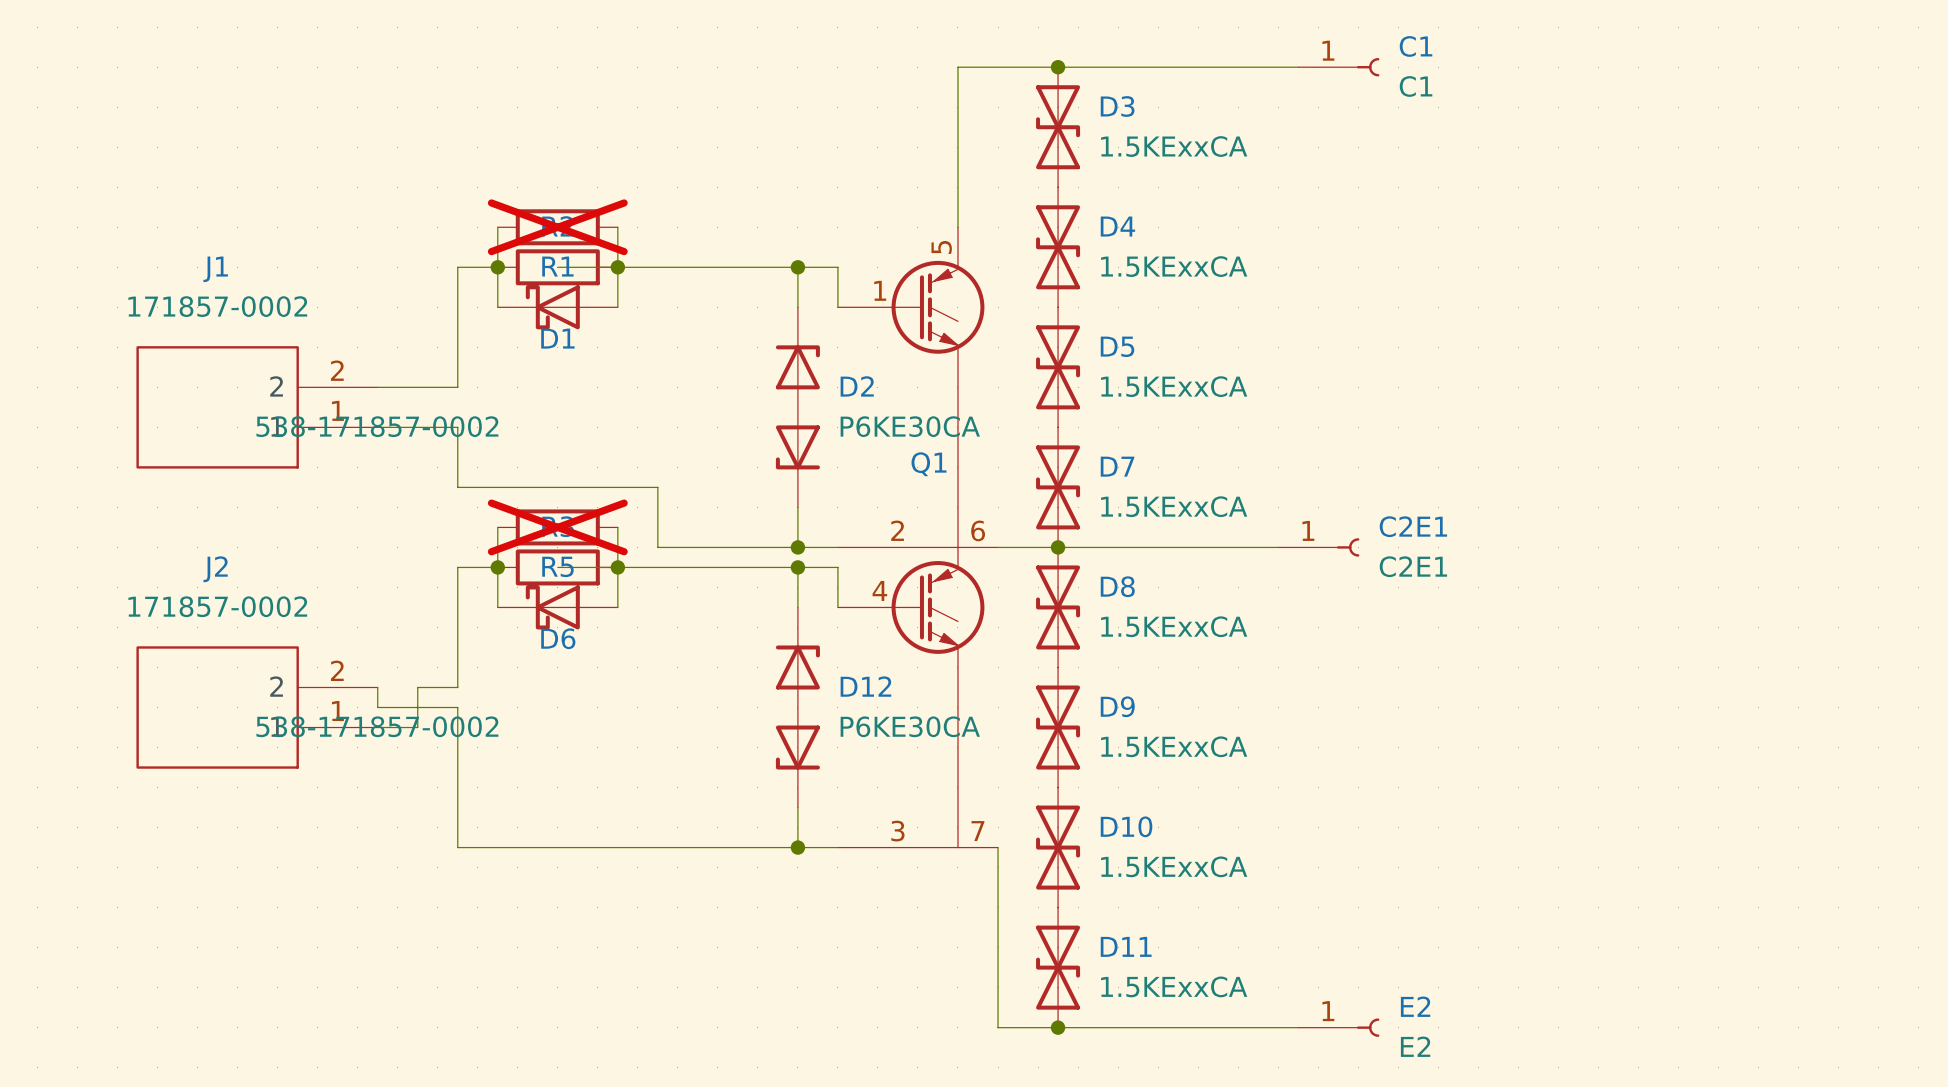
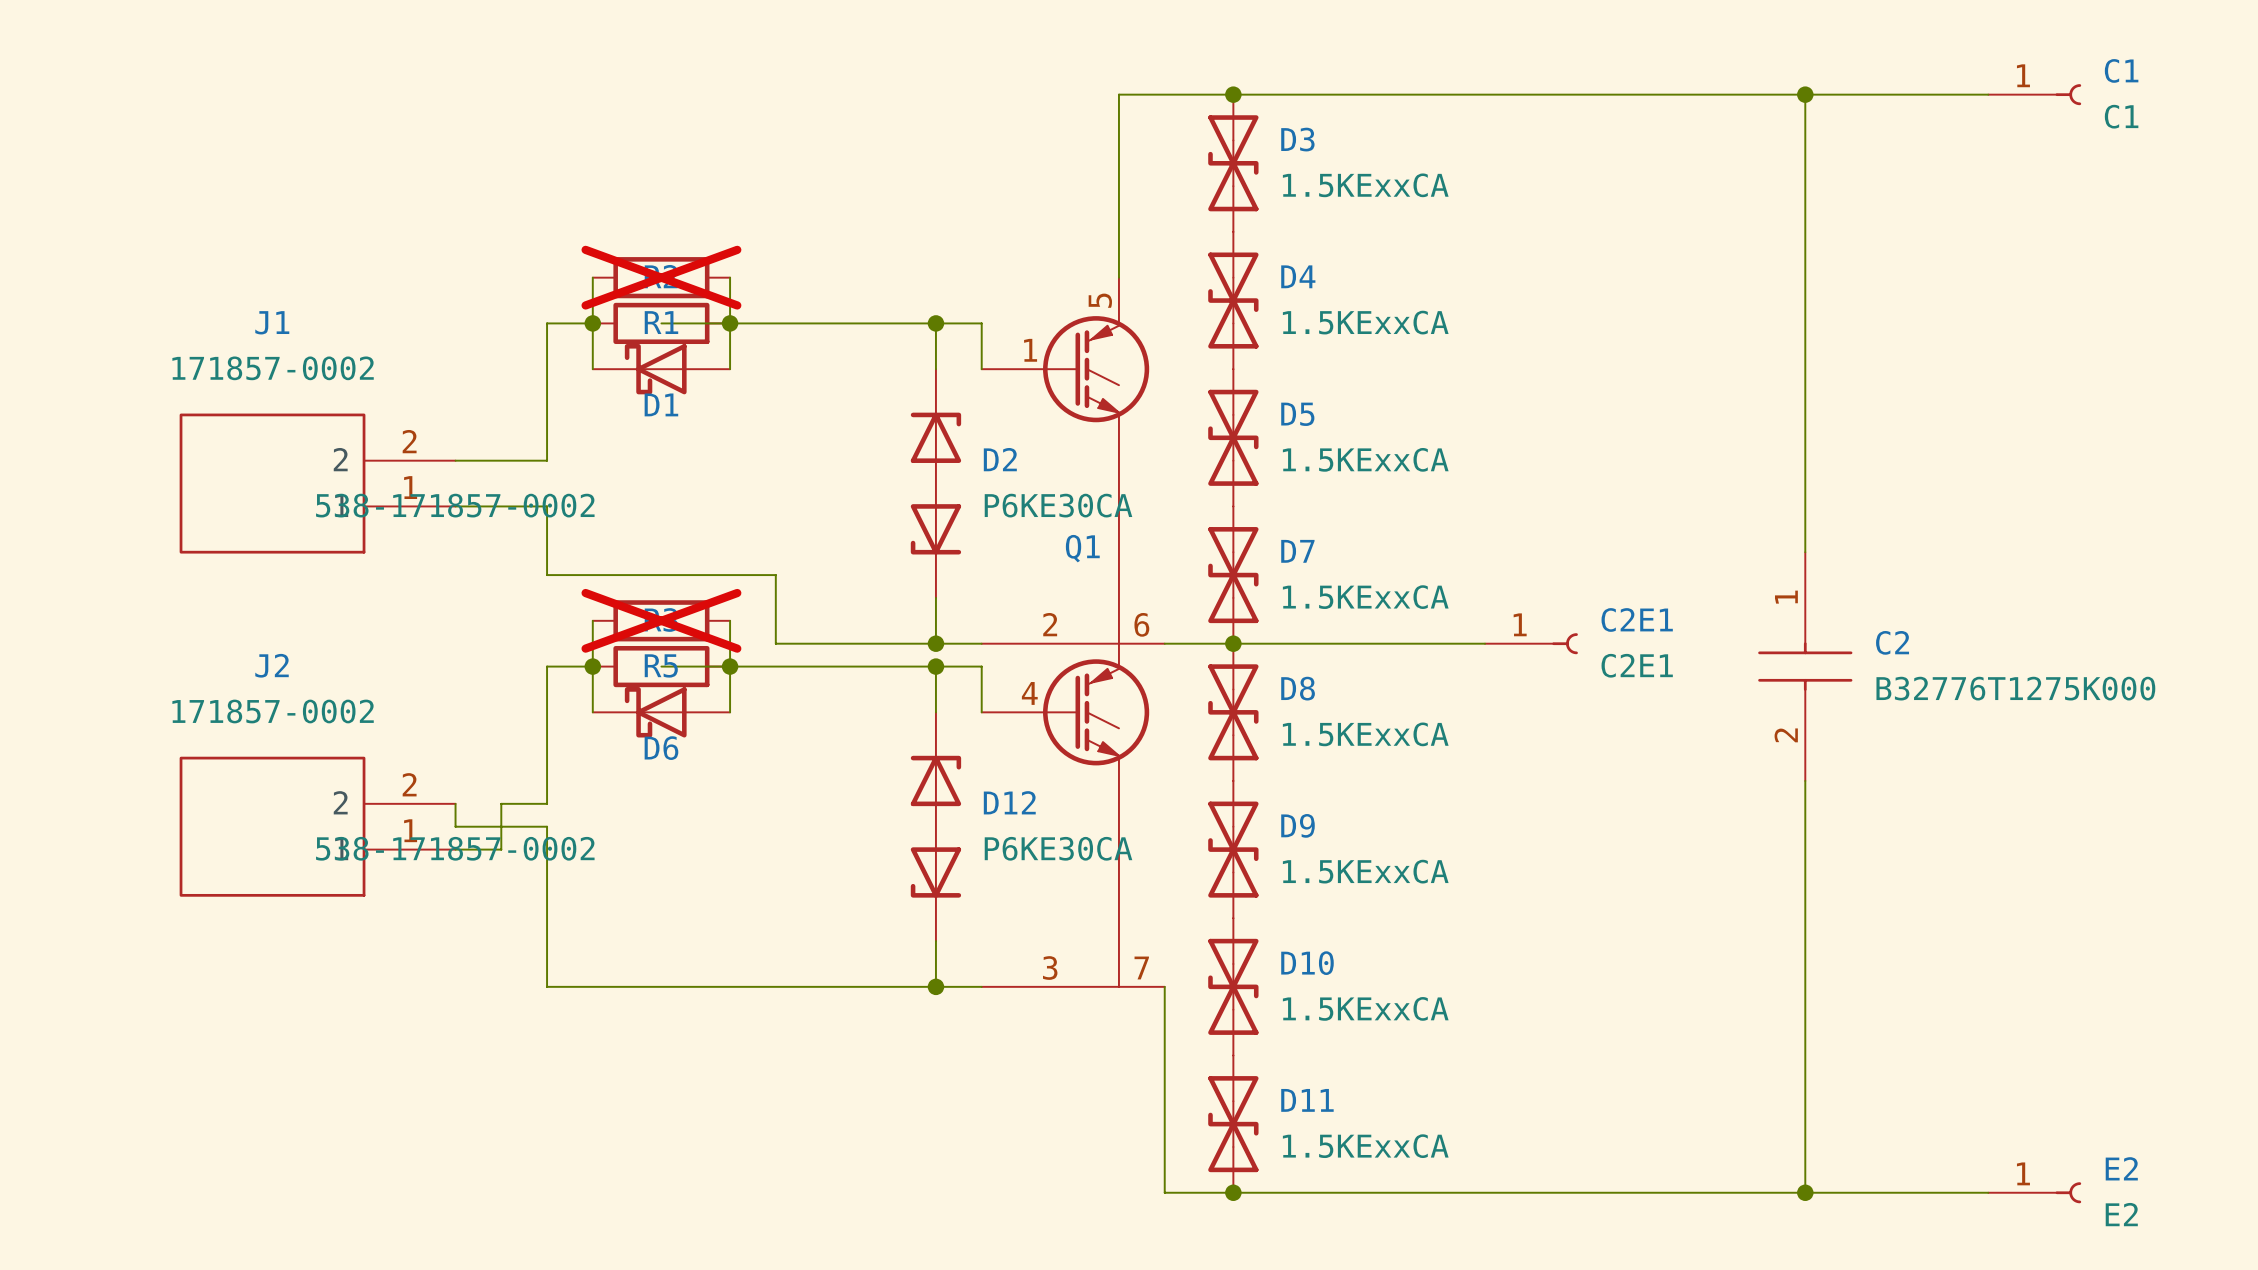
wire: none -> (1507, 94) (1988, 94)
C1 position: (1338, 67) -> (2034, 94)
wire: none -> (1805, 94) (1805, 552)
junction: none -> (1805, 94)
C2: none -> B32776T1275K000 (1805, 666)
wire: none -> (1805, 780) (1805, 1192)
wire: none -> (1507, 1192) (1988, 1192)
E2 position: (1338, 1027) -> (2034, 1192)
junction: none -> (1805, 1192)

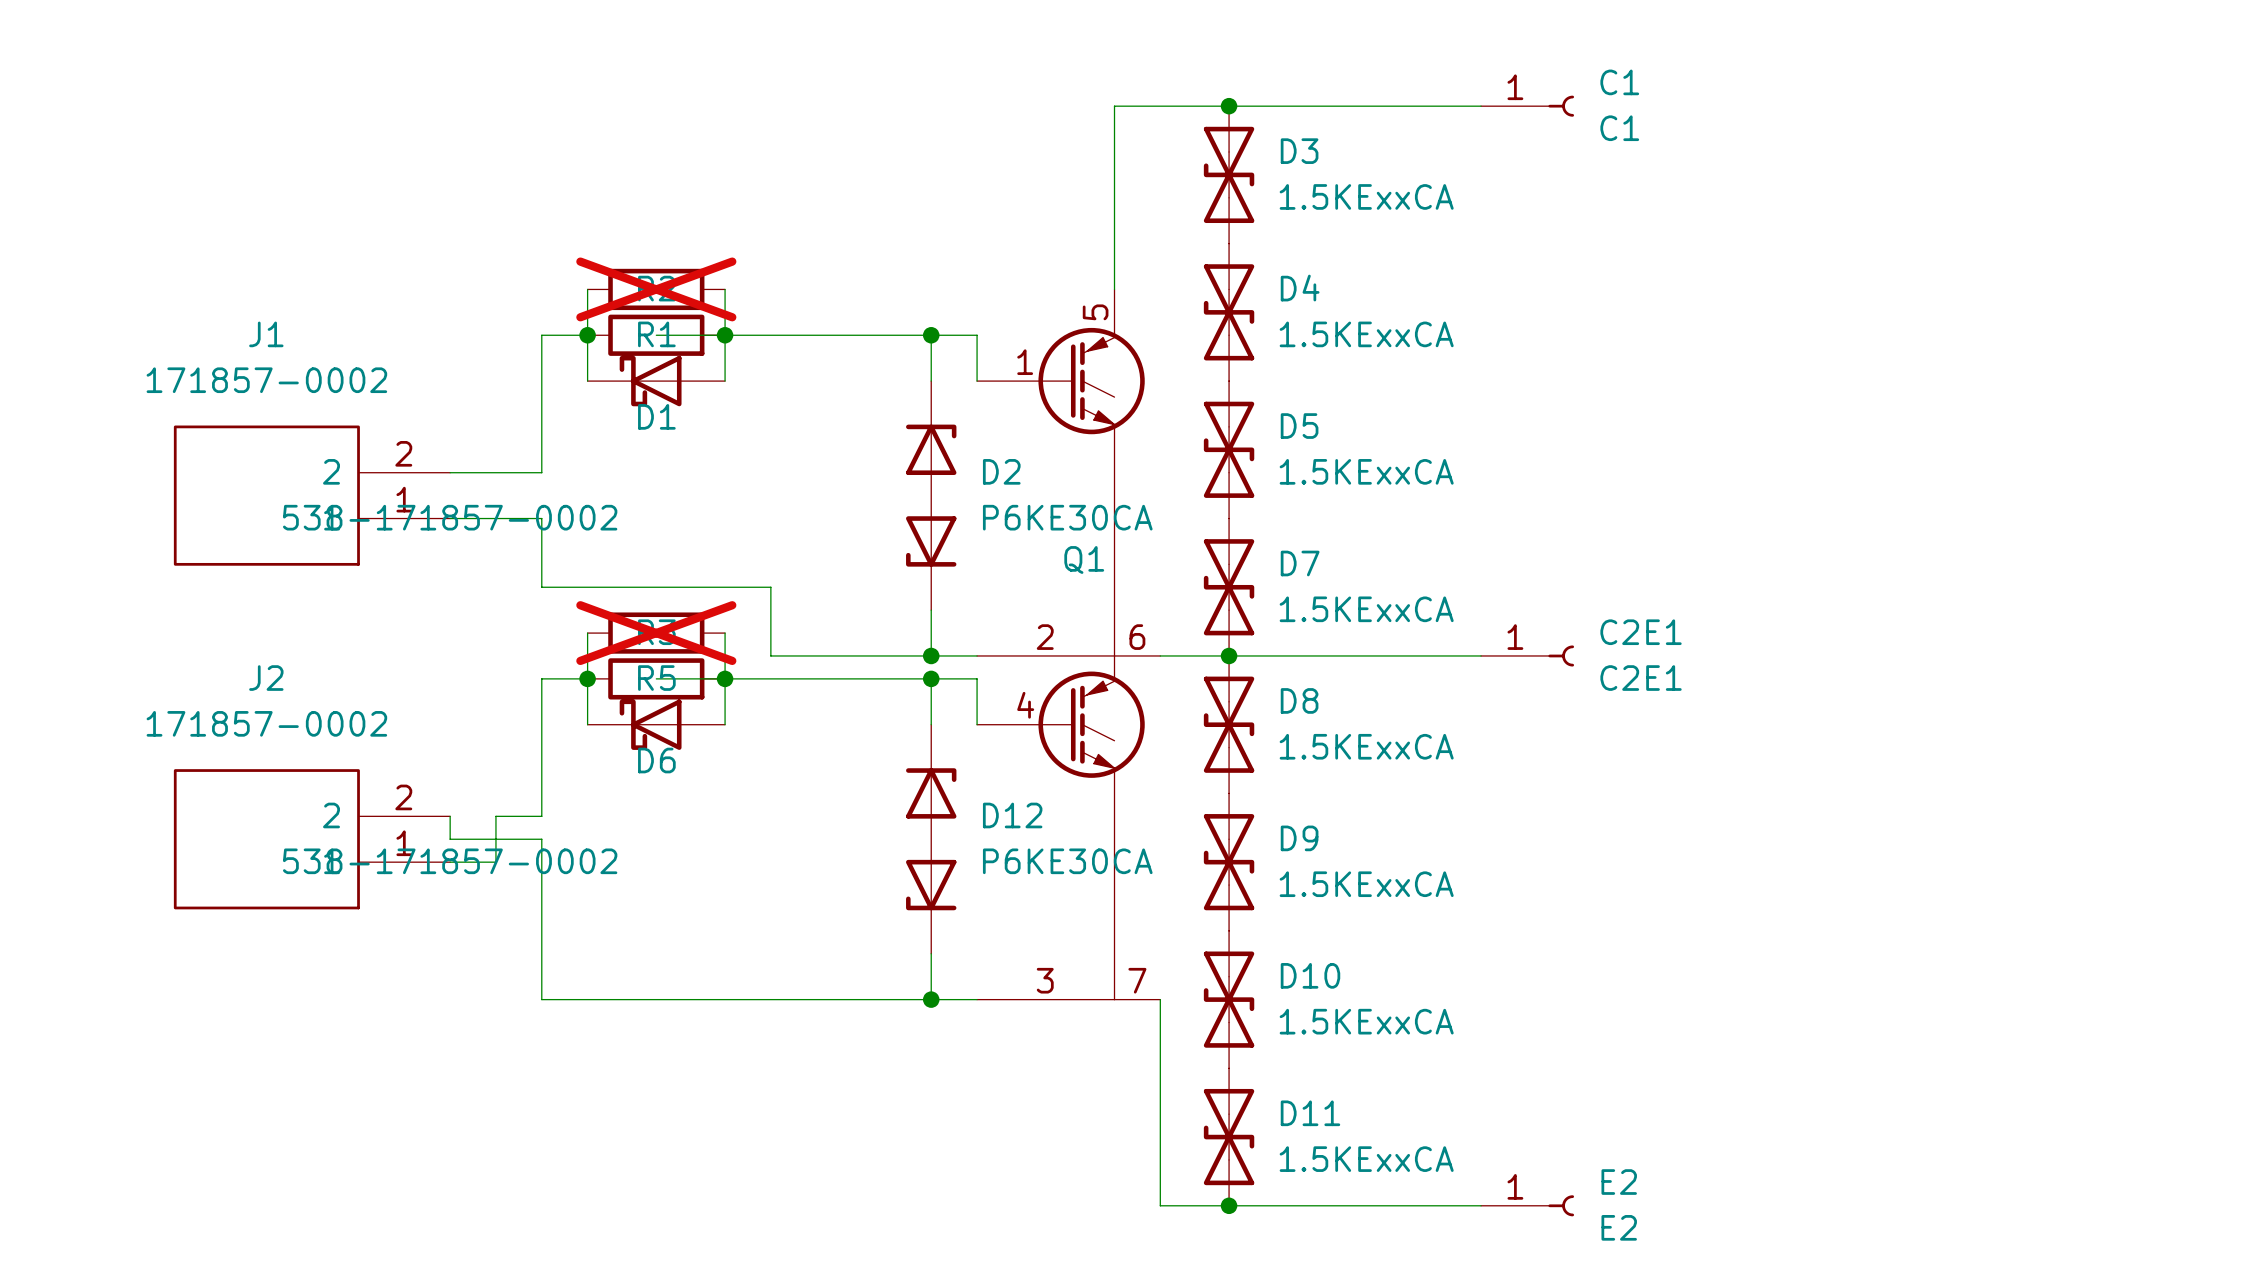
wire: (1485, 94) (1988, 94) -> none
wire: (1805, 94) (1805, 552) -> none
junction: (1805, 94) -> none
C1 position: (2034, 94) -> (1527, 106)
C2: B32776T1275K000 (1805, 666) -> none
wire: (1805, 780) (1805, 1192) -> none
wire: (1485, 1192) (1988, 1192) -> none
junction: (1805, 1192) -> none
E2 position: (2034, 1192) -> (1527, 1205)

